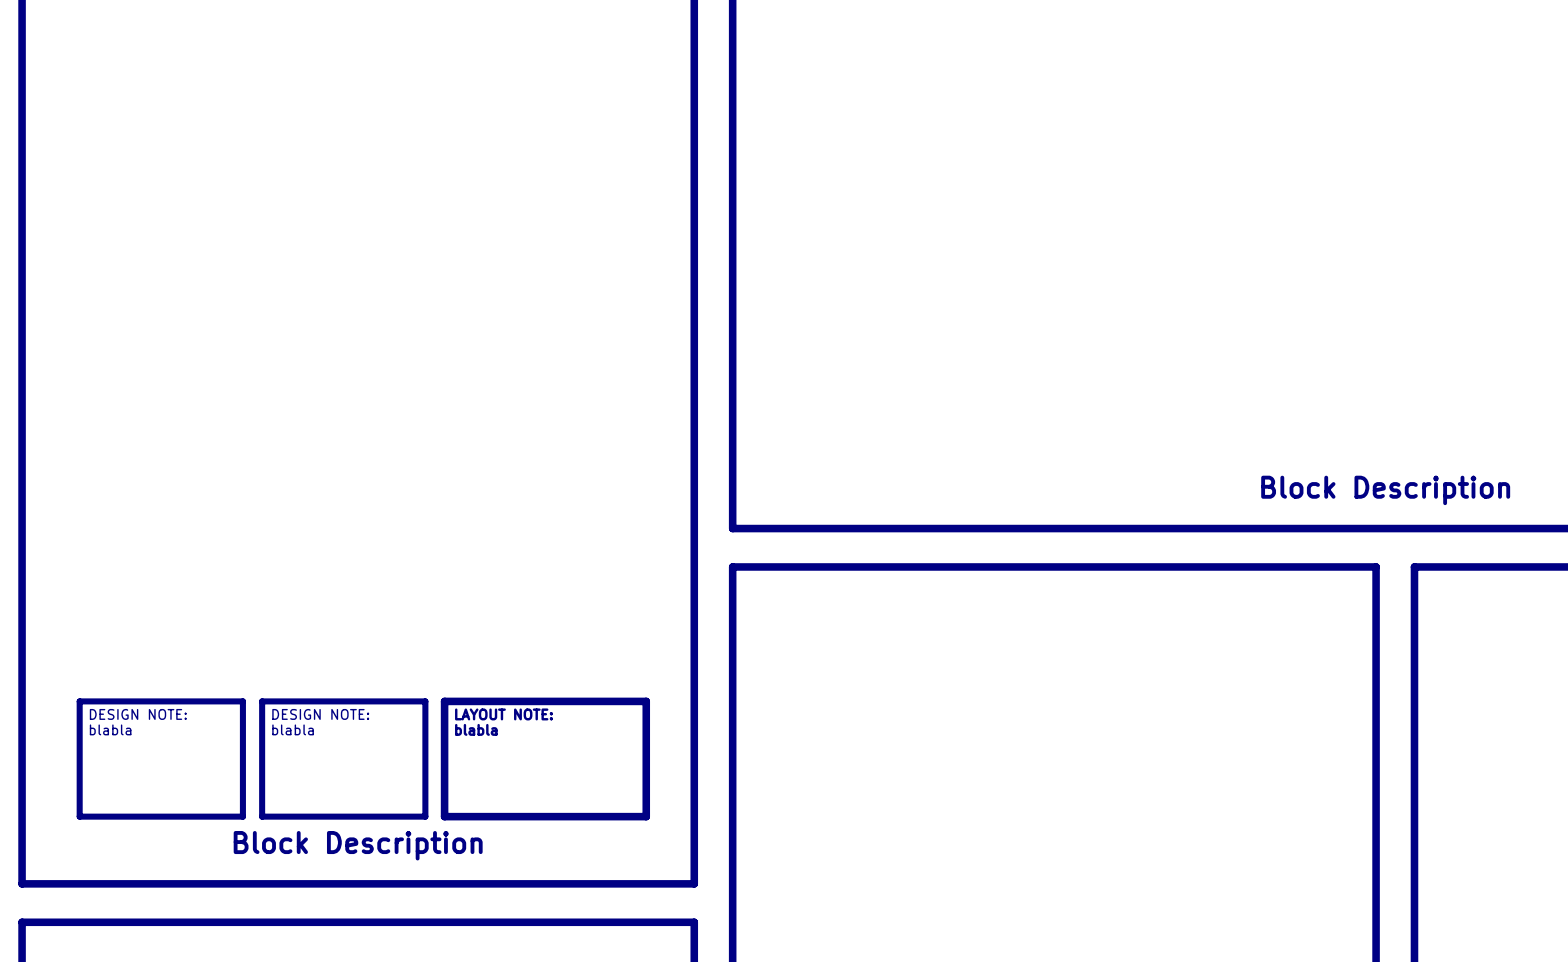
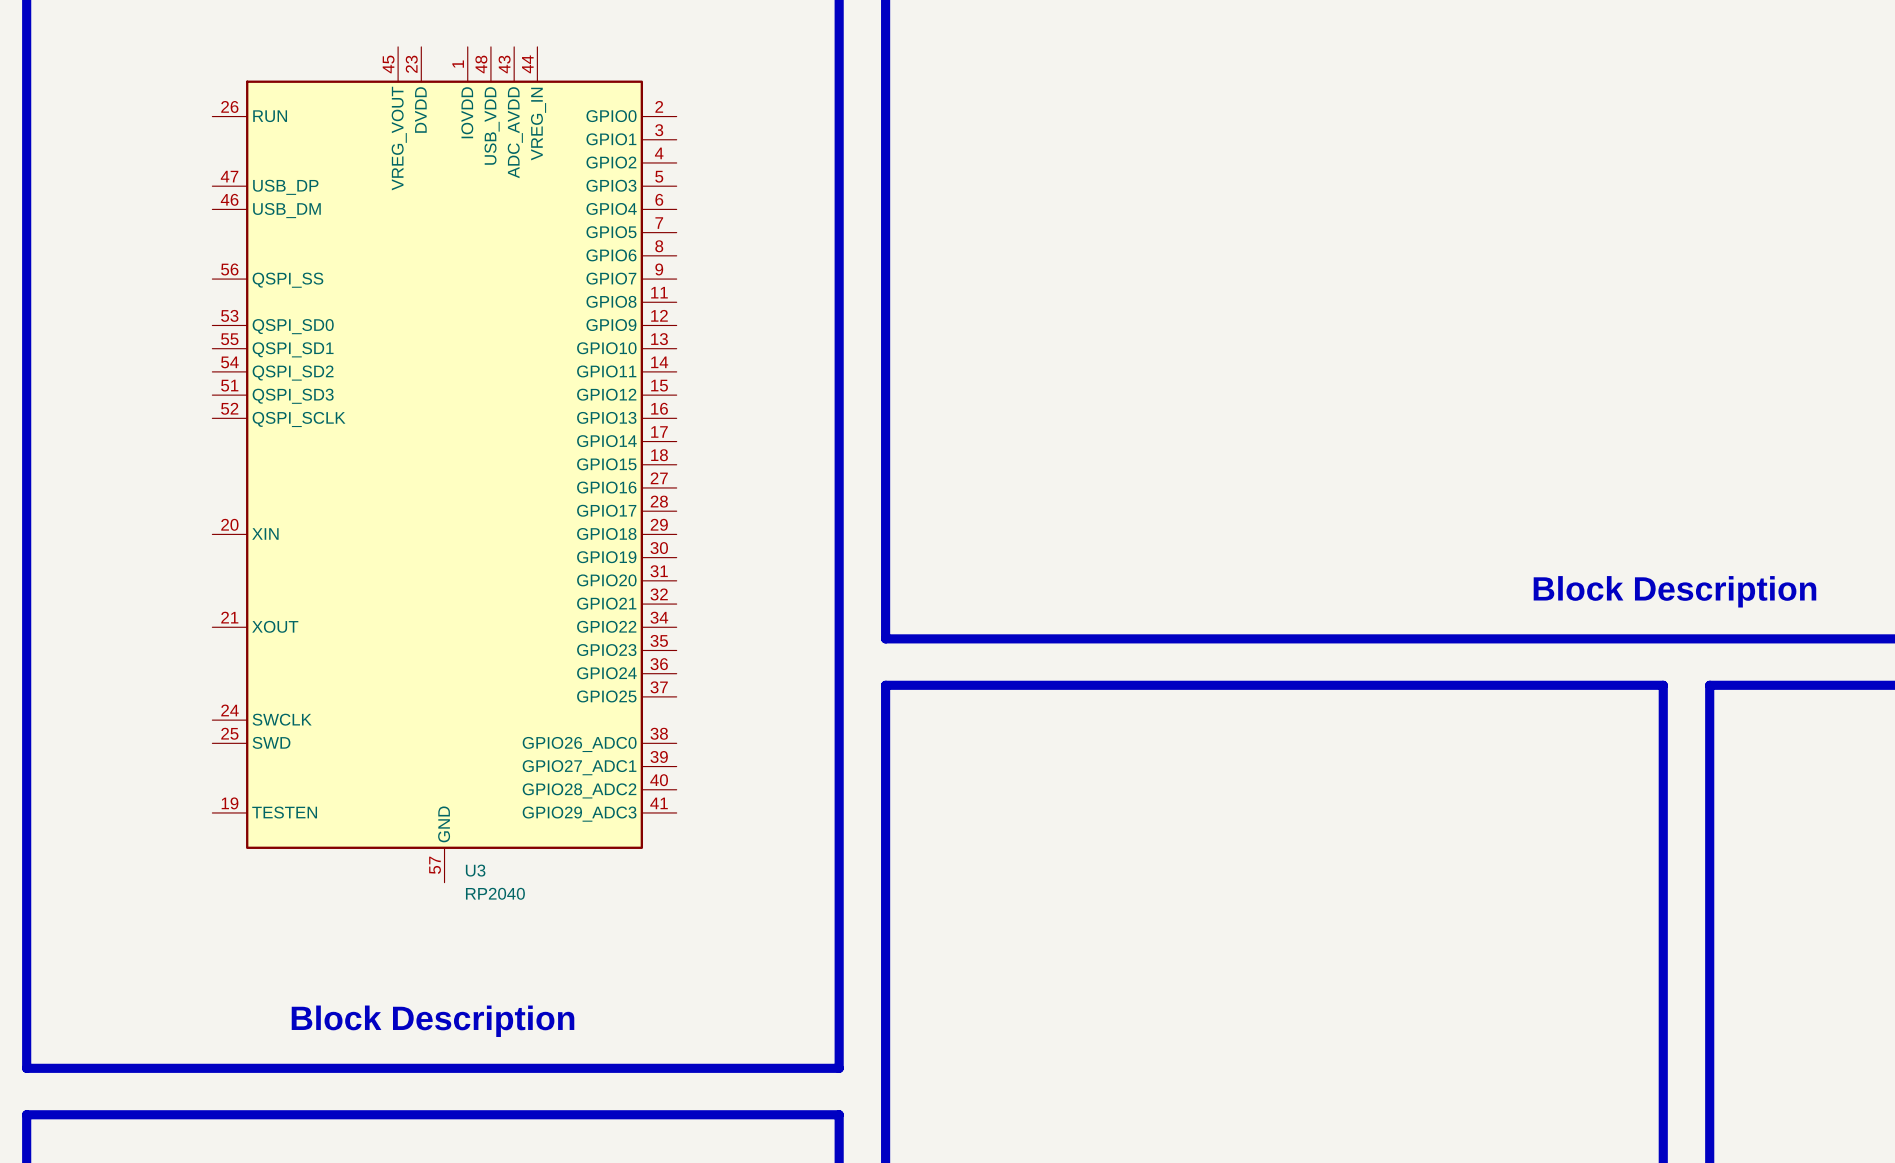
U3: none -> RP2040 (444, 464)
line: (79, 701) (242, 701) (242, 816) (79, 816) (79, 701) -> none
line: (262, 701) (425, 701) (425, 816) (262, 816) (262, 701) -> none
line: (444, 701) (646, 701) (646, 816) (444, 816) (444, 701) -> none
text: DESIGN NOTE: (138, 714) -> none
text: DESIGN NOTE: (320, 714) -> none
text: LAYOUT NOTE: (504, 714) -> none
text: blabla (110, 729) -> none
text: blabla (293, 729) -> none
text: blabla (476, 729) -> none

